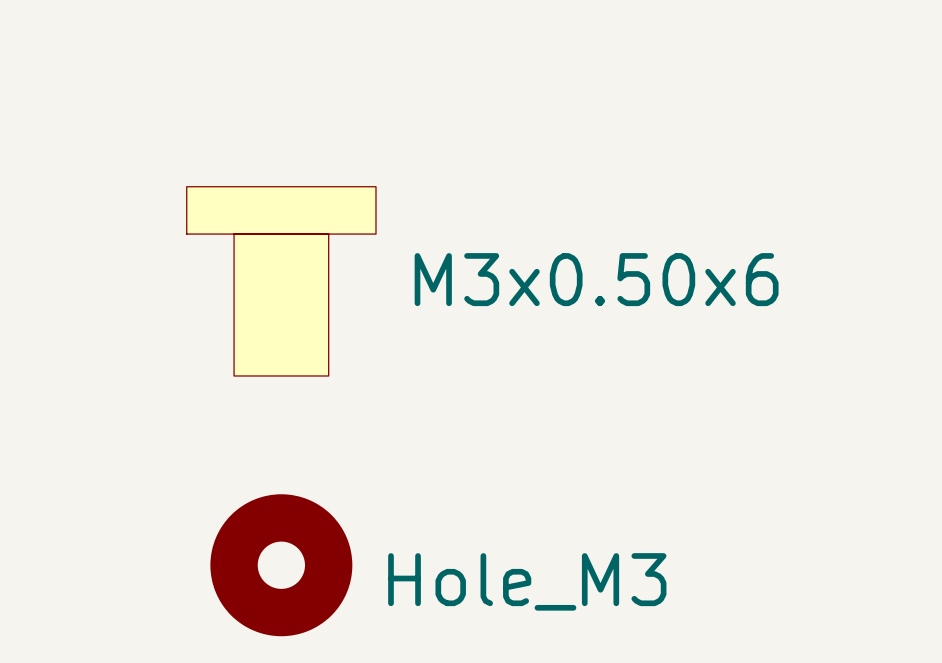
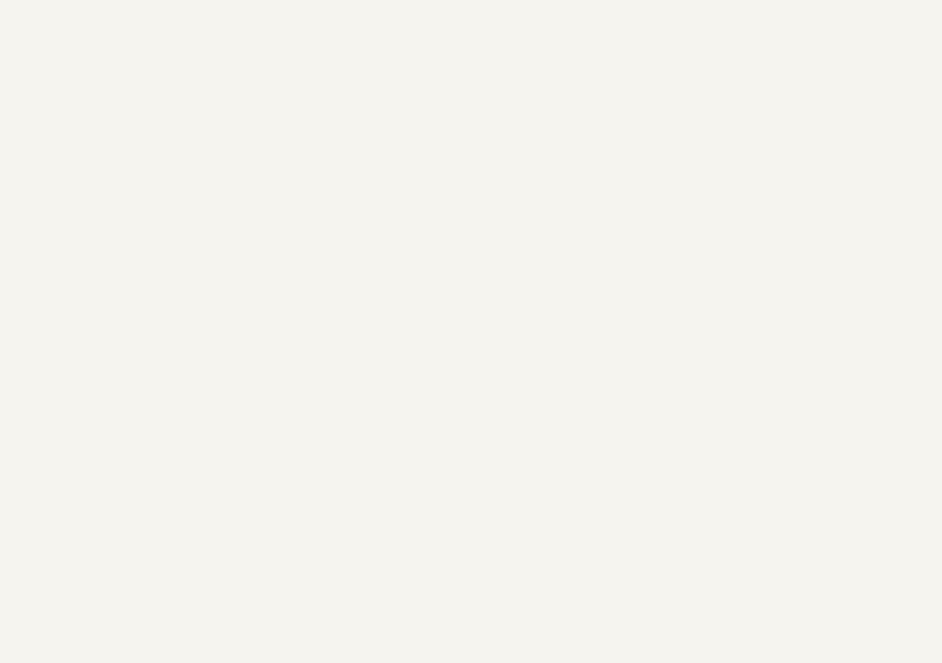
part: M3x0.50x6 (281, 281) -> none
part: Hole_M3 (281, 565) -> none

